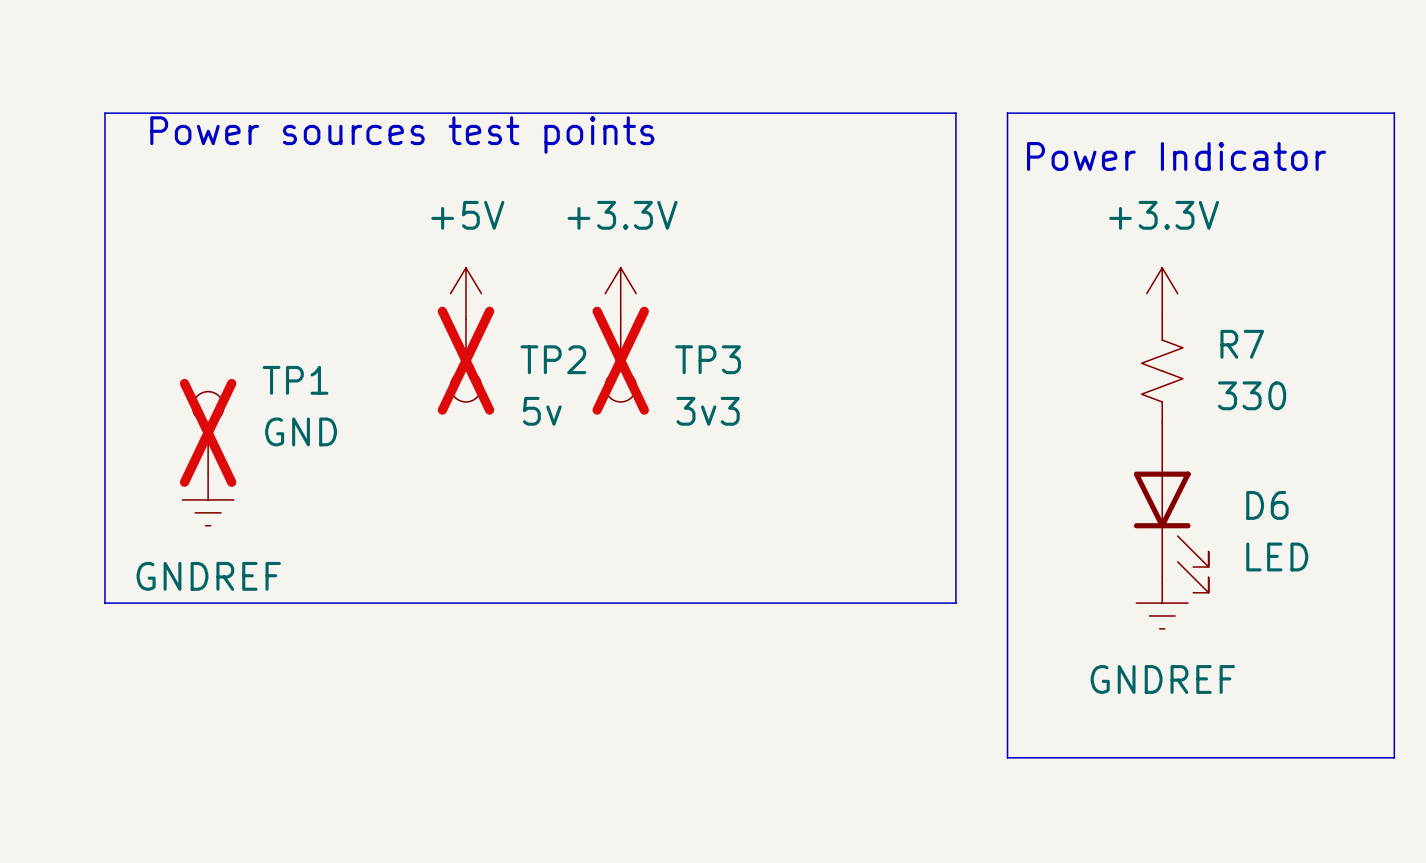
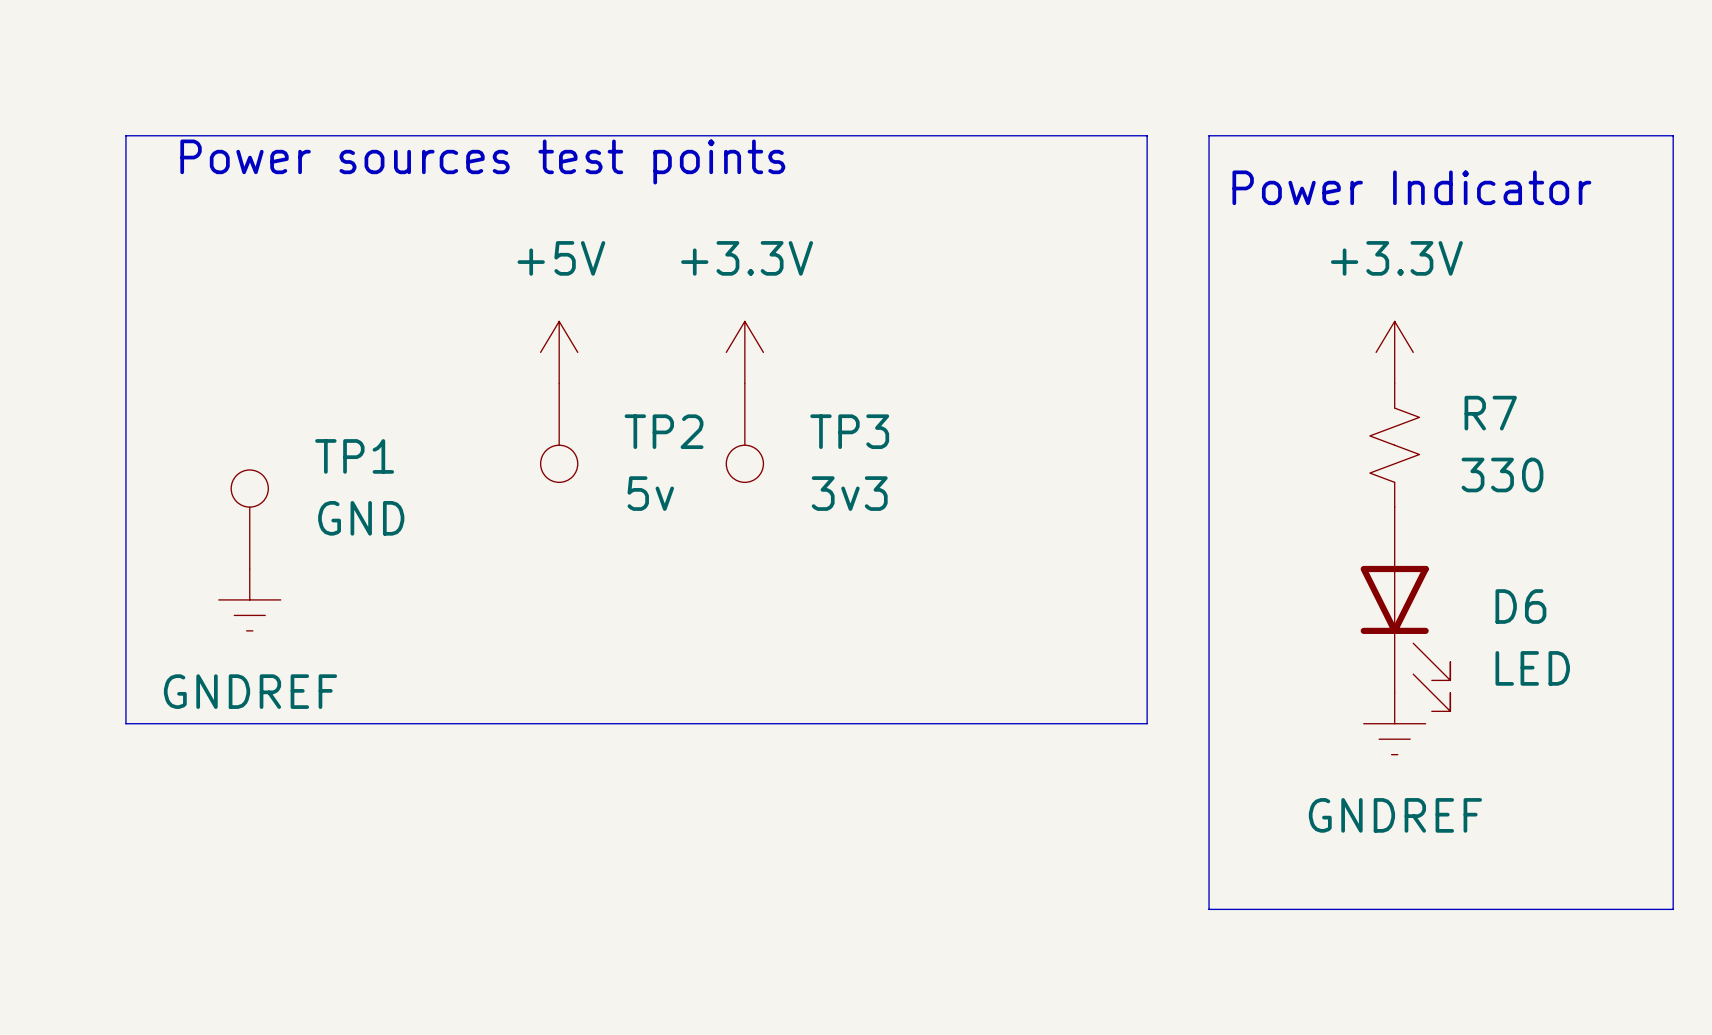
TP2 do-not-place cross: (465, 360) -> none
TP3 do-not-place cross: (620, 360) -> none
TP1 do-not-place cross: (208, 432) -> none

